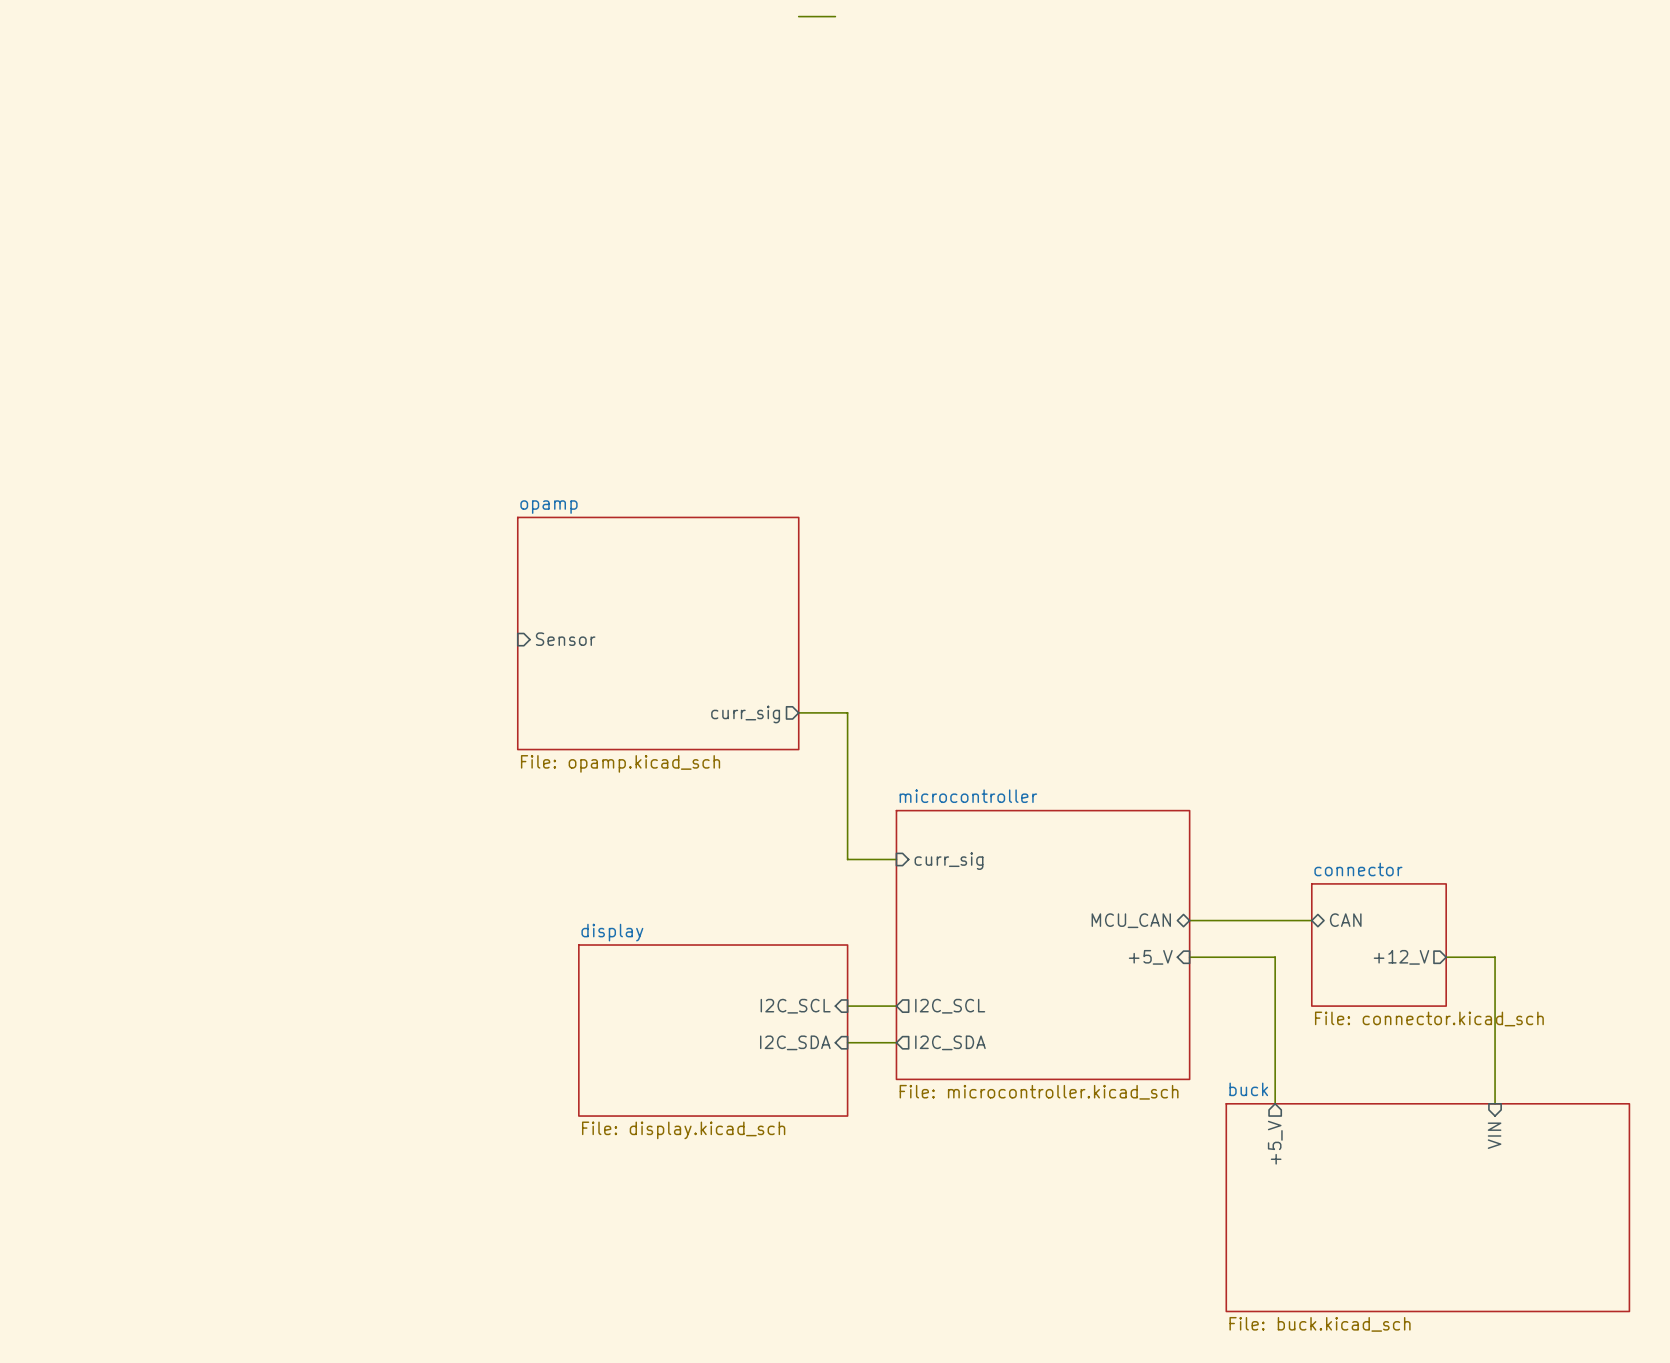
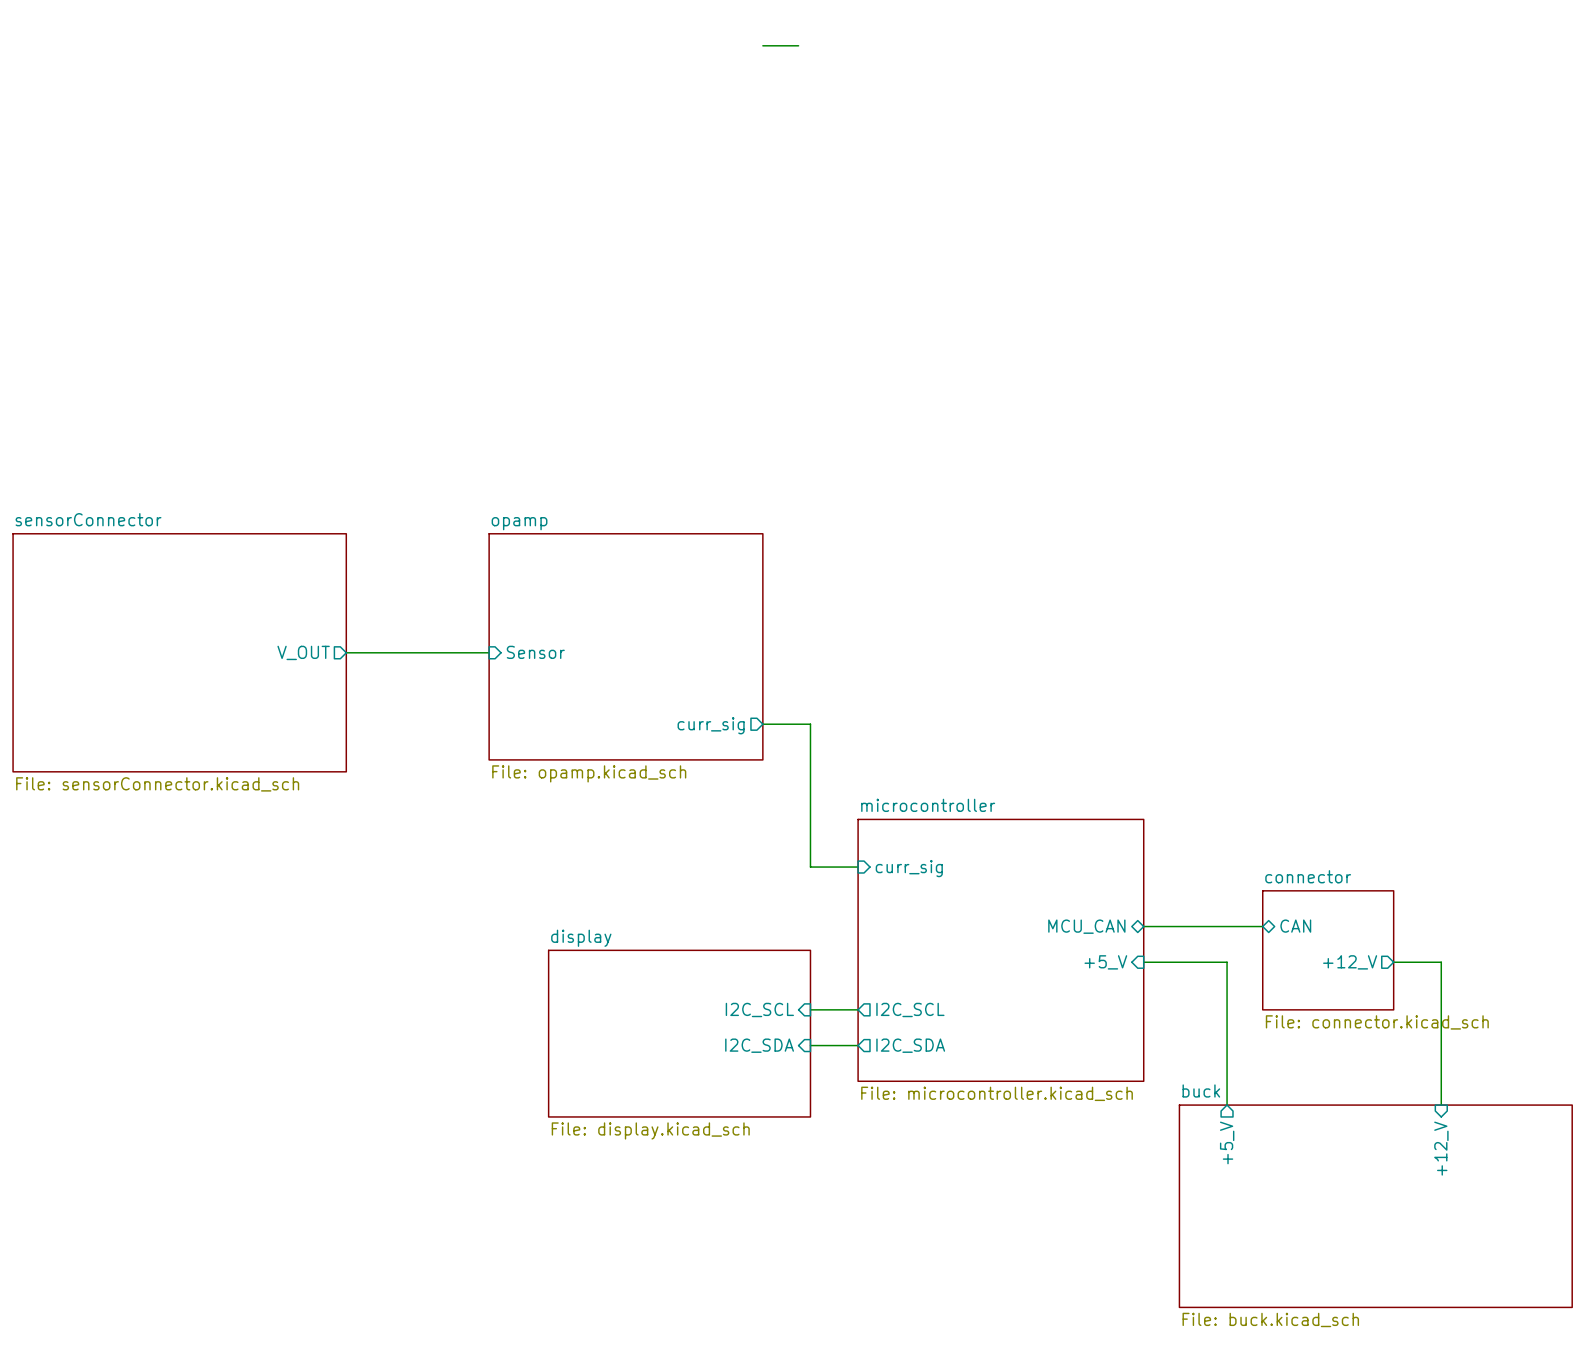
sheet sensorConnector: none -> File: sensorConnector.kicad_sch (179, 652)
sheet pin: none -> V_OUT (303, 652)
wire: none -> (346, 652) (489, 652)
sheet pin: VIN (1494, 1135) -> +12_V (1441, 1148)

